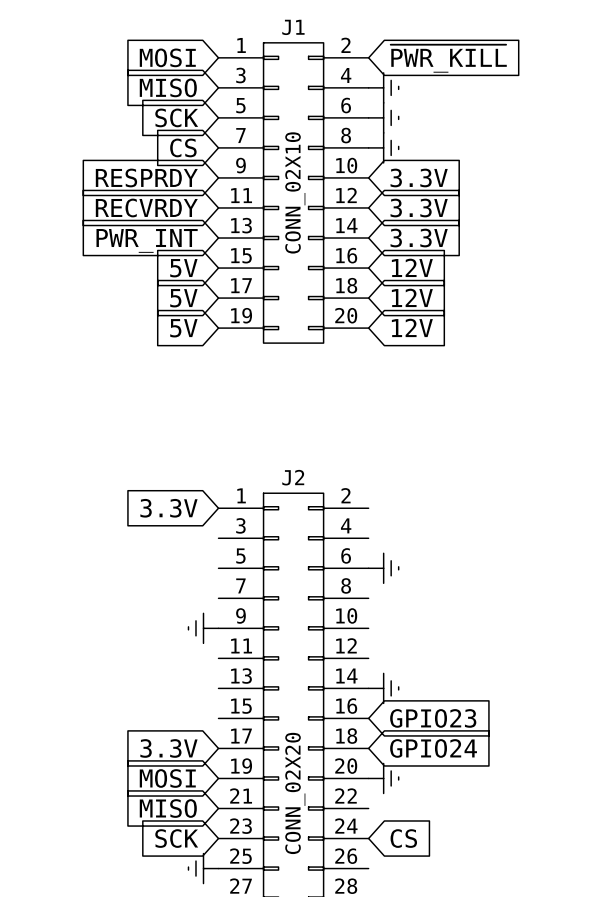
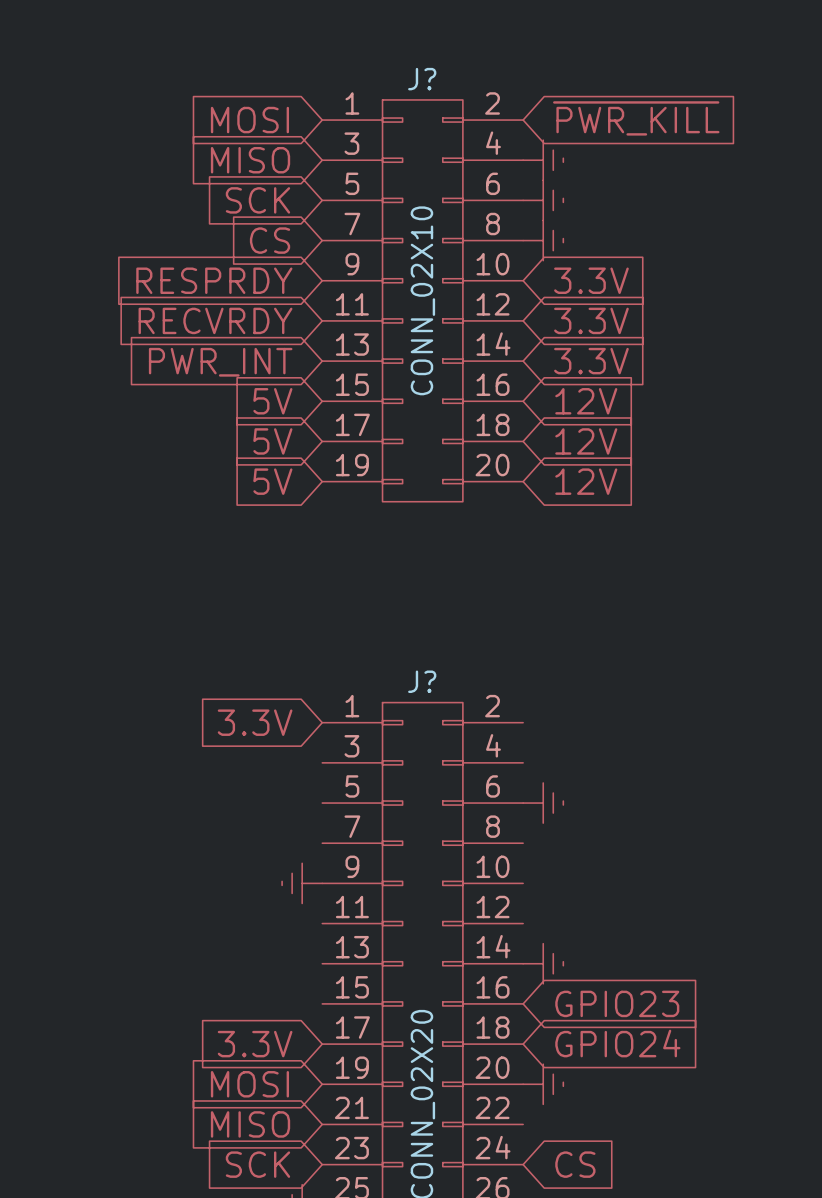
J1 name: J1 (293, 27) -> J? (422, 79)
J2 name: J2 (293, 477) -> J? (422, 681)

